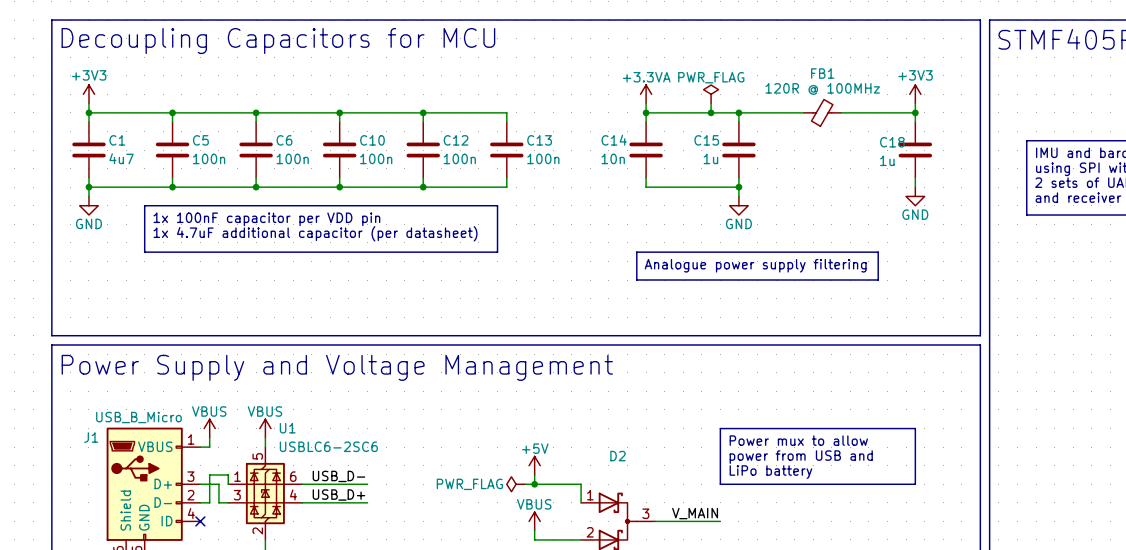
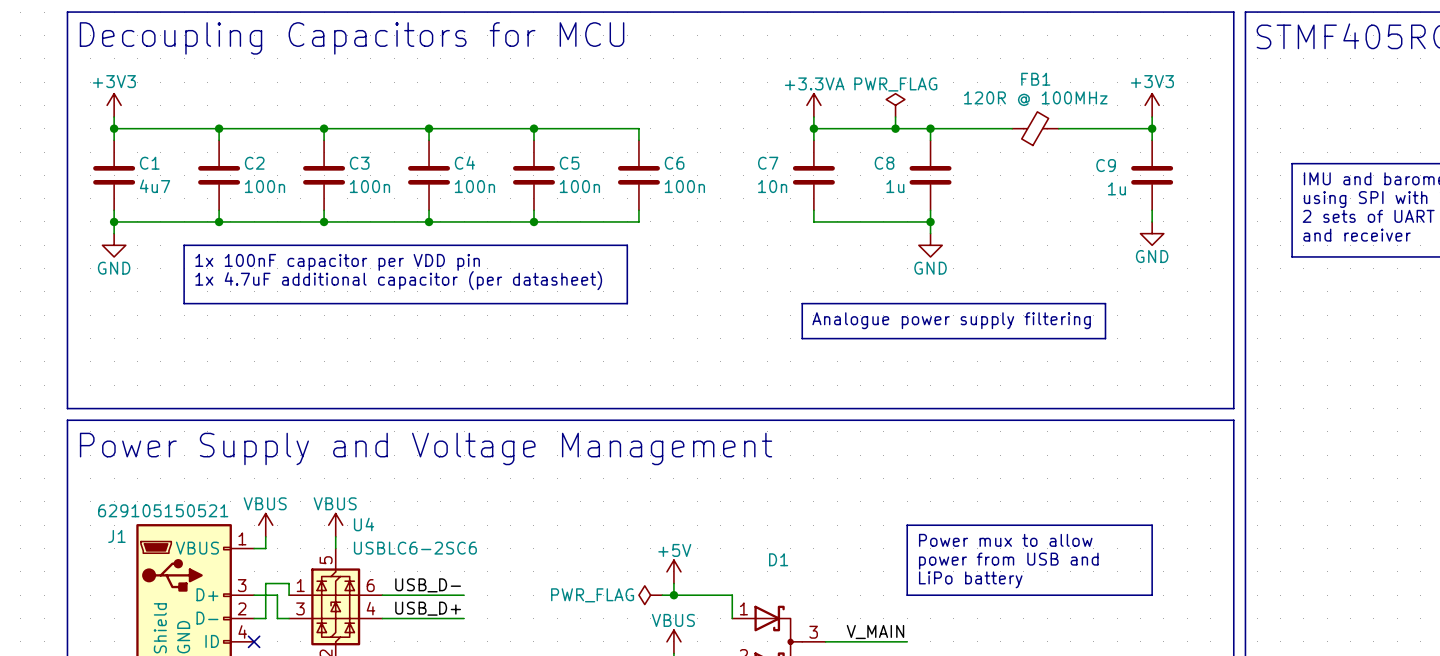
C5 name: C5 (200, 140) -> C2 (254, 163)
C6 name: C6 (284, 140) -> C3 (359, 163)
C10 name: C10 (372, 140) -> C4 (464, 162)
C12 name: C12 (456, 140) -> C5 (569, 163)
C13 name: C13 (539, 140) -> C6 (674, 163)
C14 name: C14 (614, 140) -> C7 (768, 163)
C15 name: C15 (706, 140) -> C8 (884, 163)
C18 name: C18 (892, 142) -> C9 (1106, 165)
J1 value: USB_B_Micro (138, 417) -> 629105150521 (163, 510)
U1 name: U1 (287, 428) -> U4 (364, 524)
D2 name: D2 (617, 456) -> D1 (778, 559)

